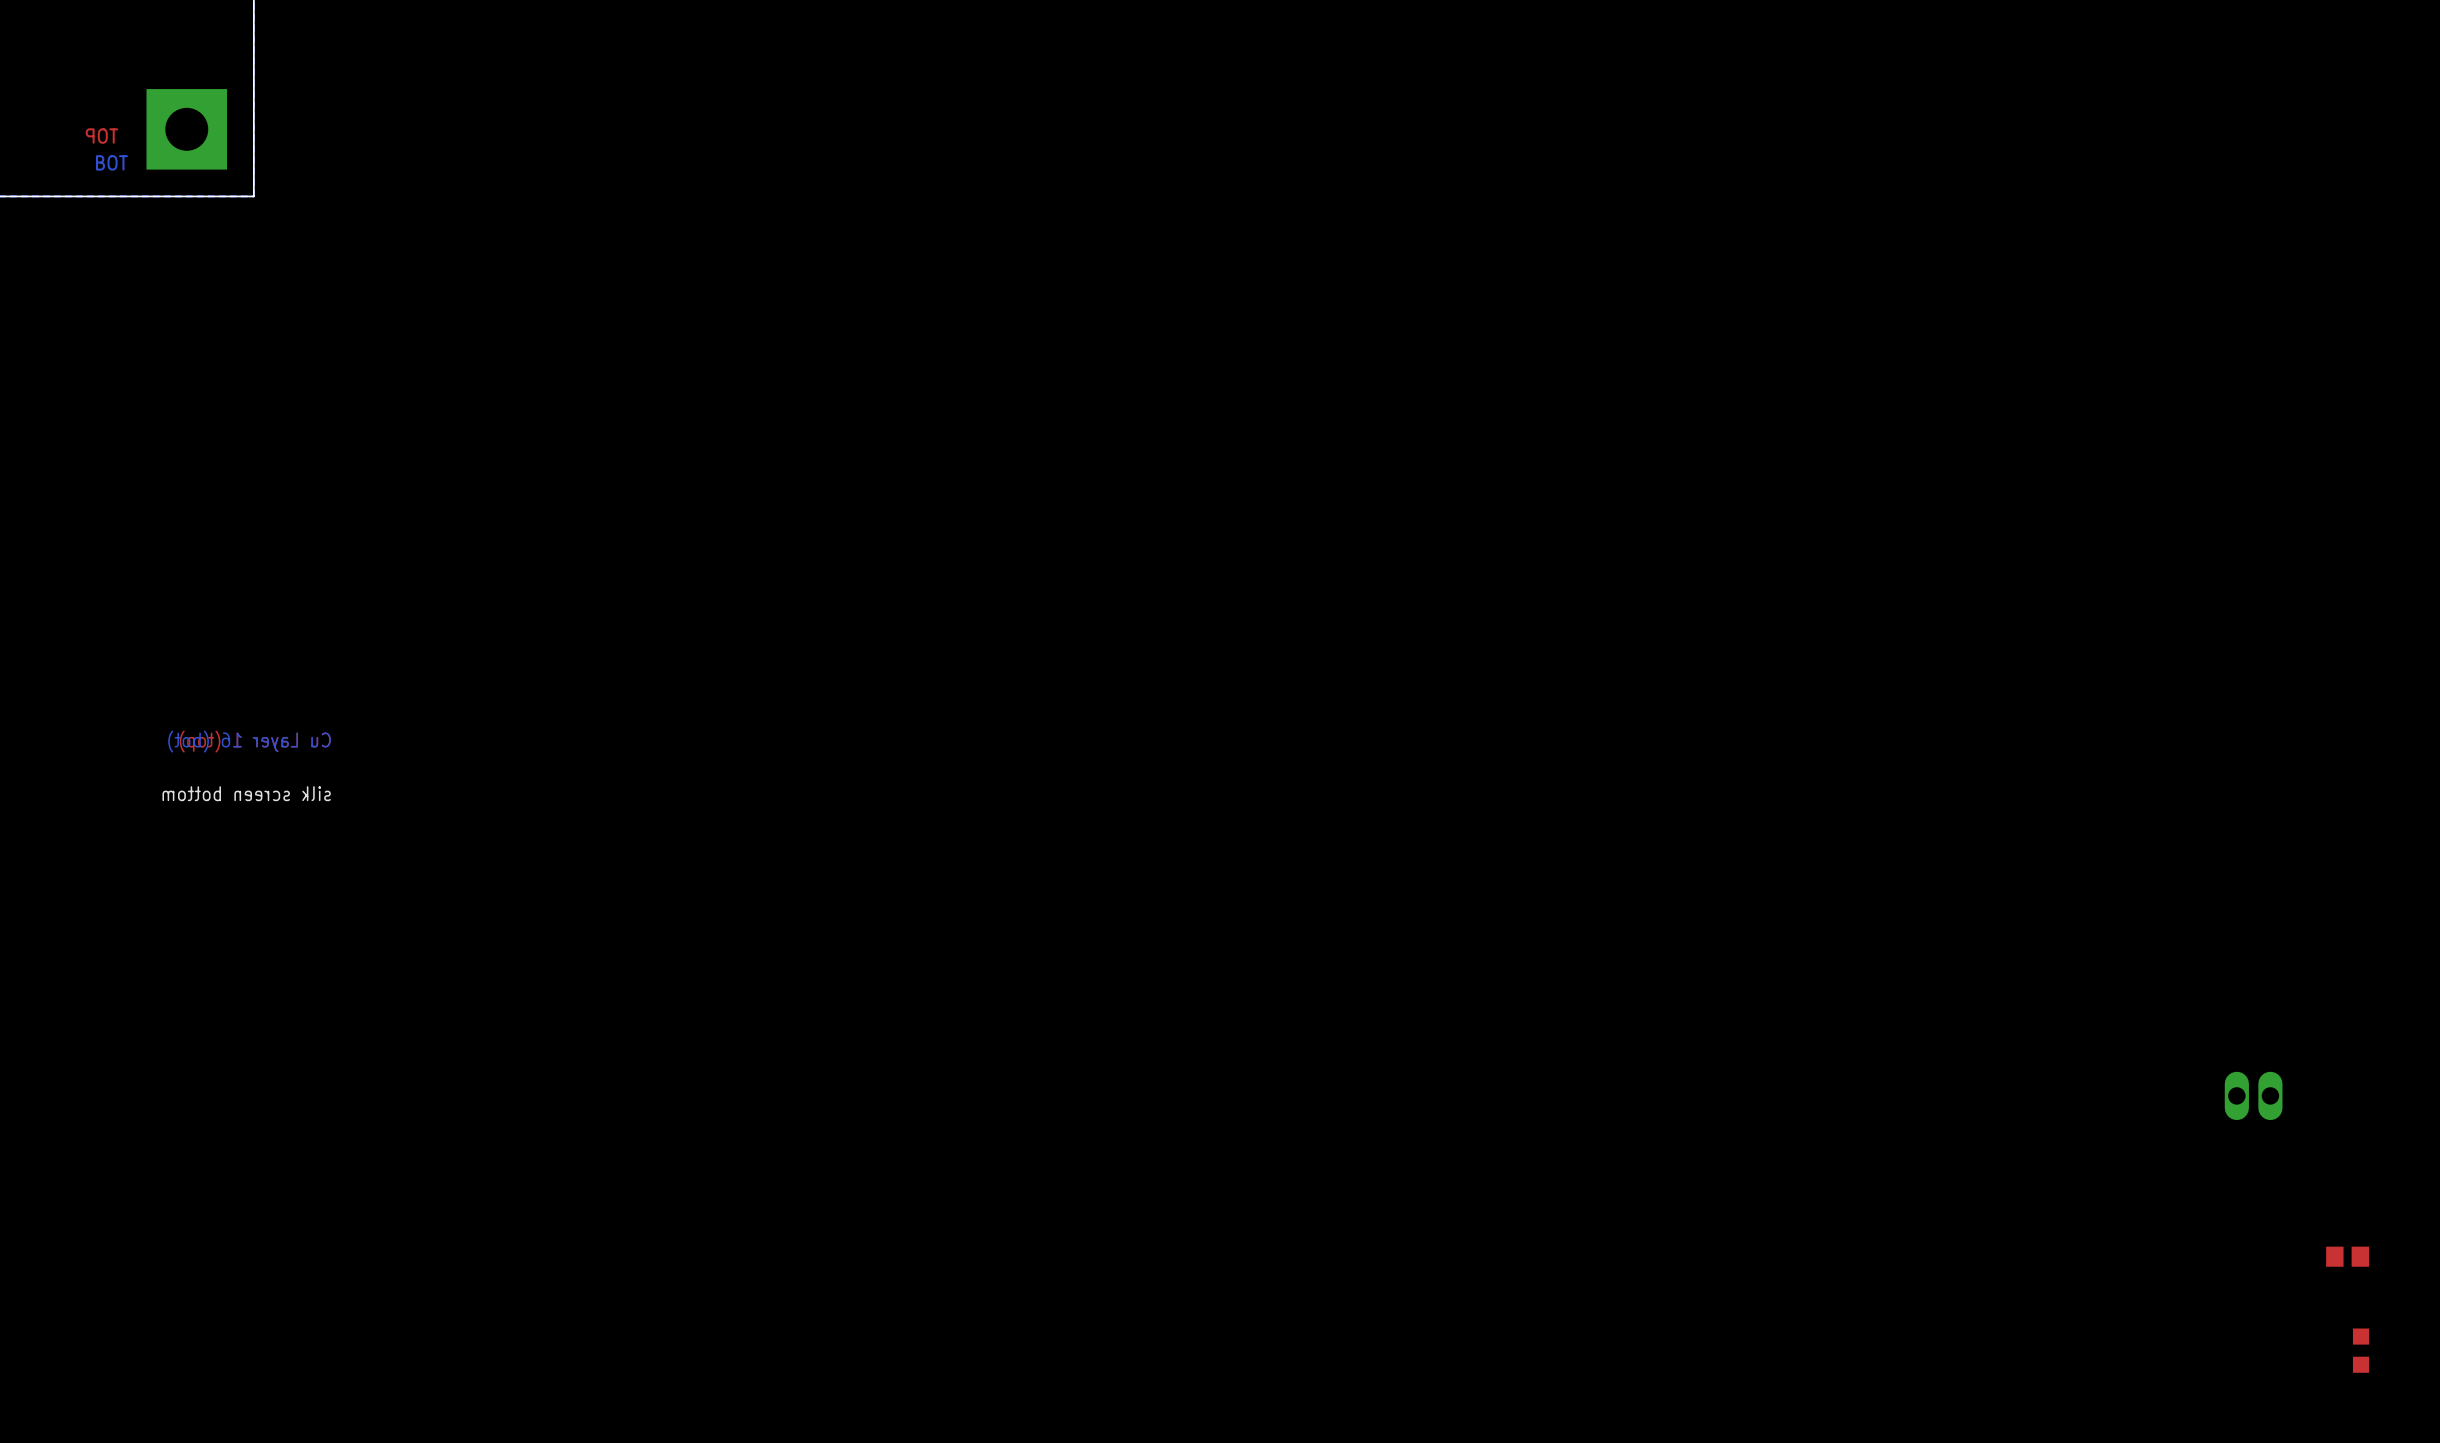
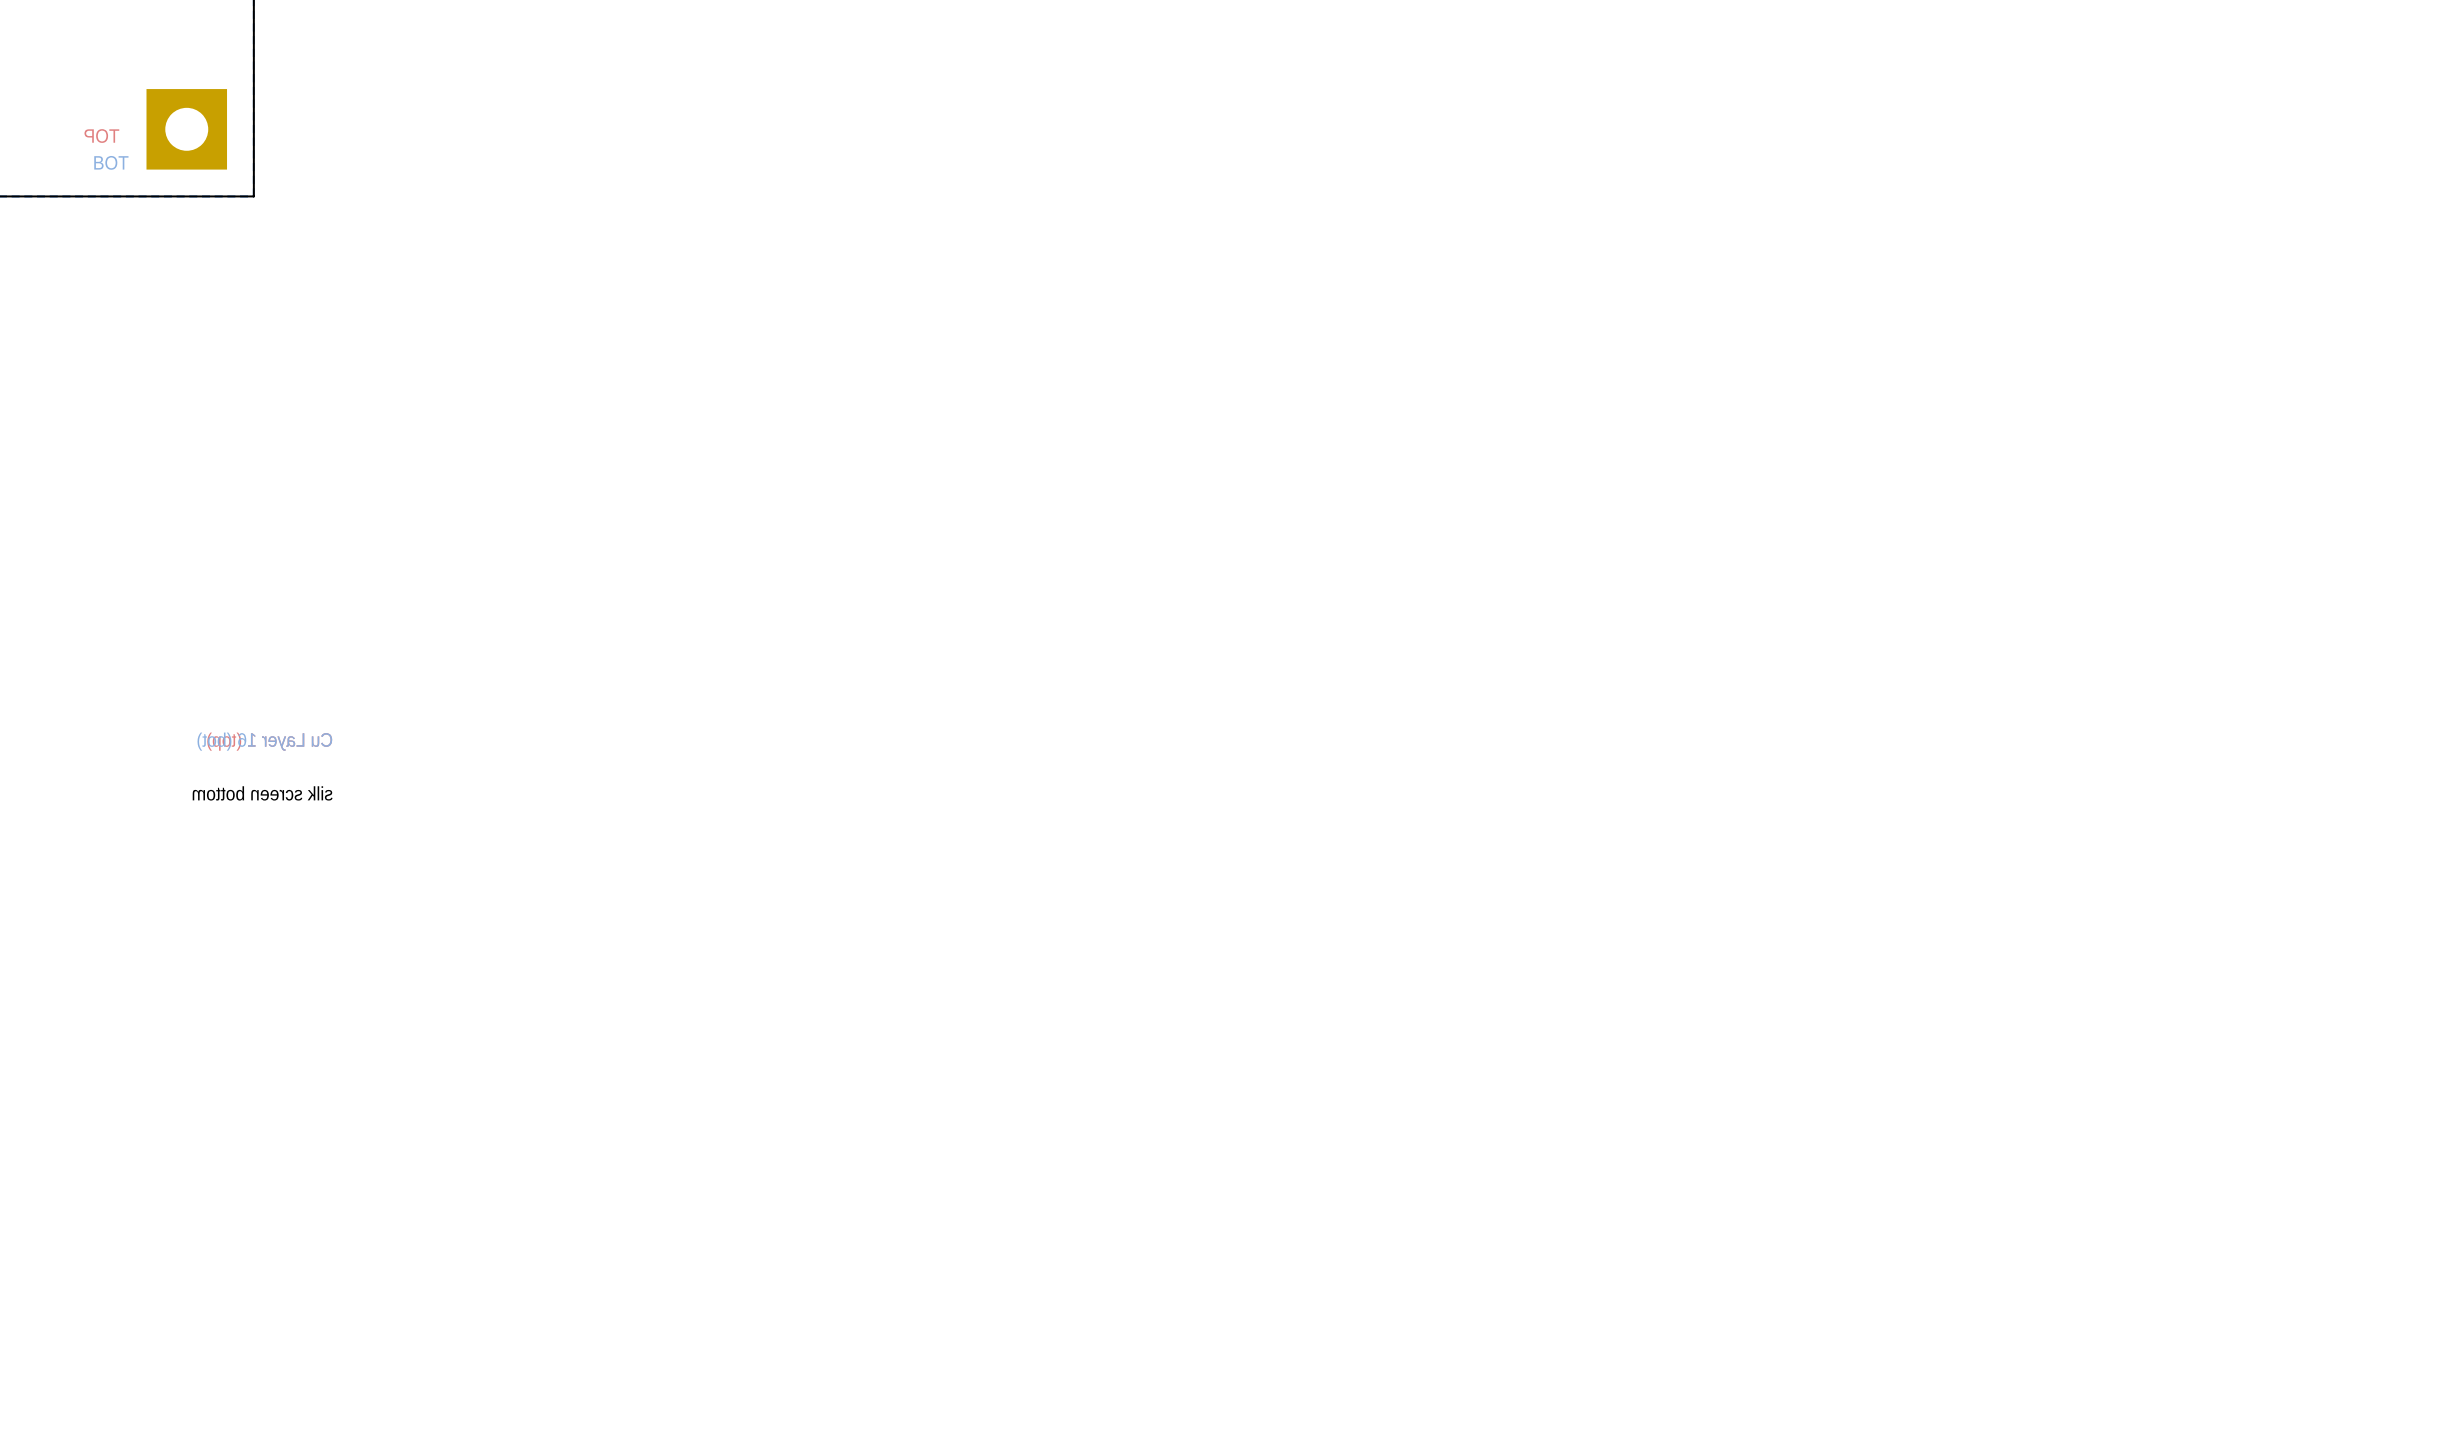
part: (2253, 1095) -> none
part: (2347, 1256) -> none
part: (2361, 1350) -> none

